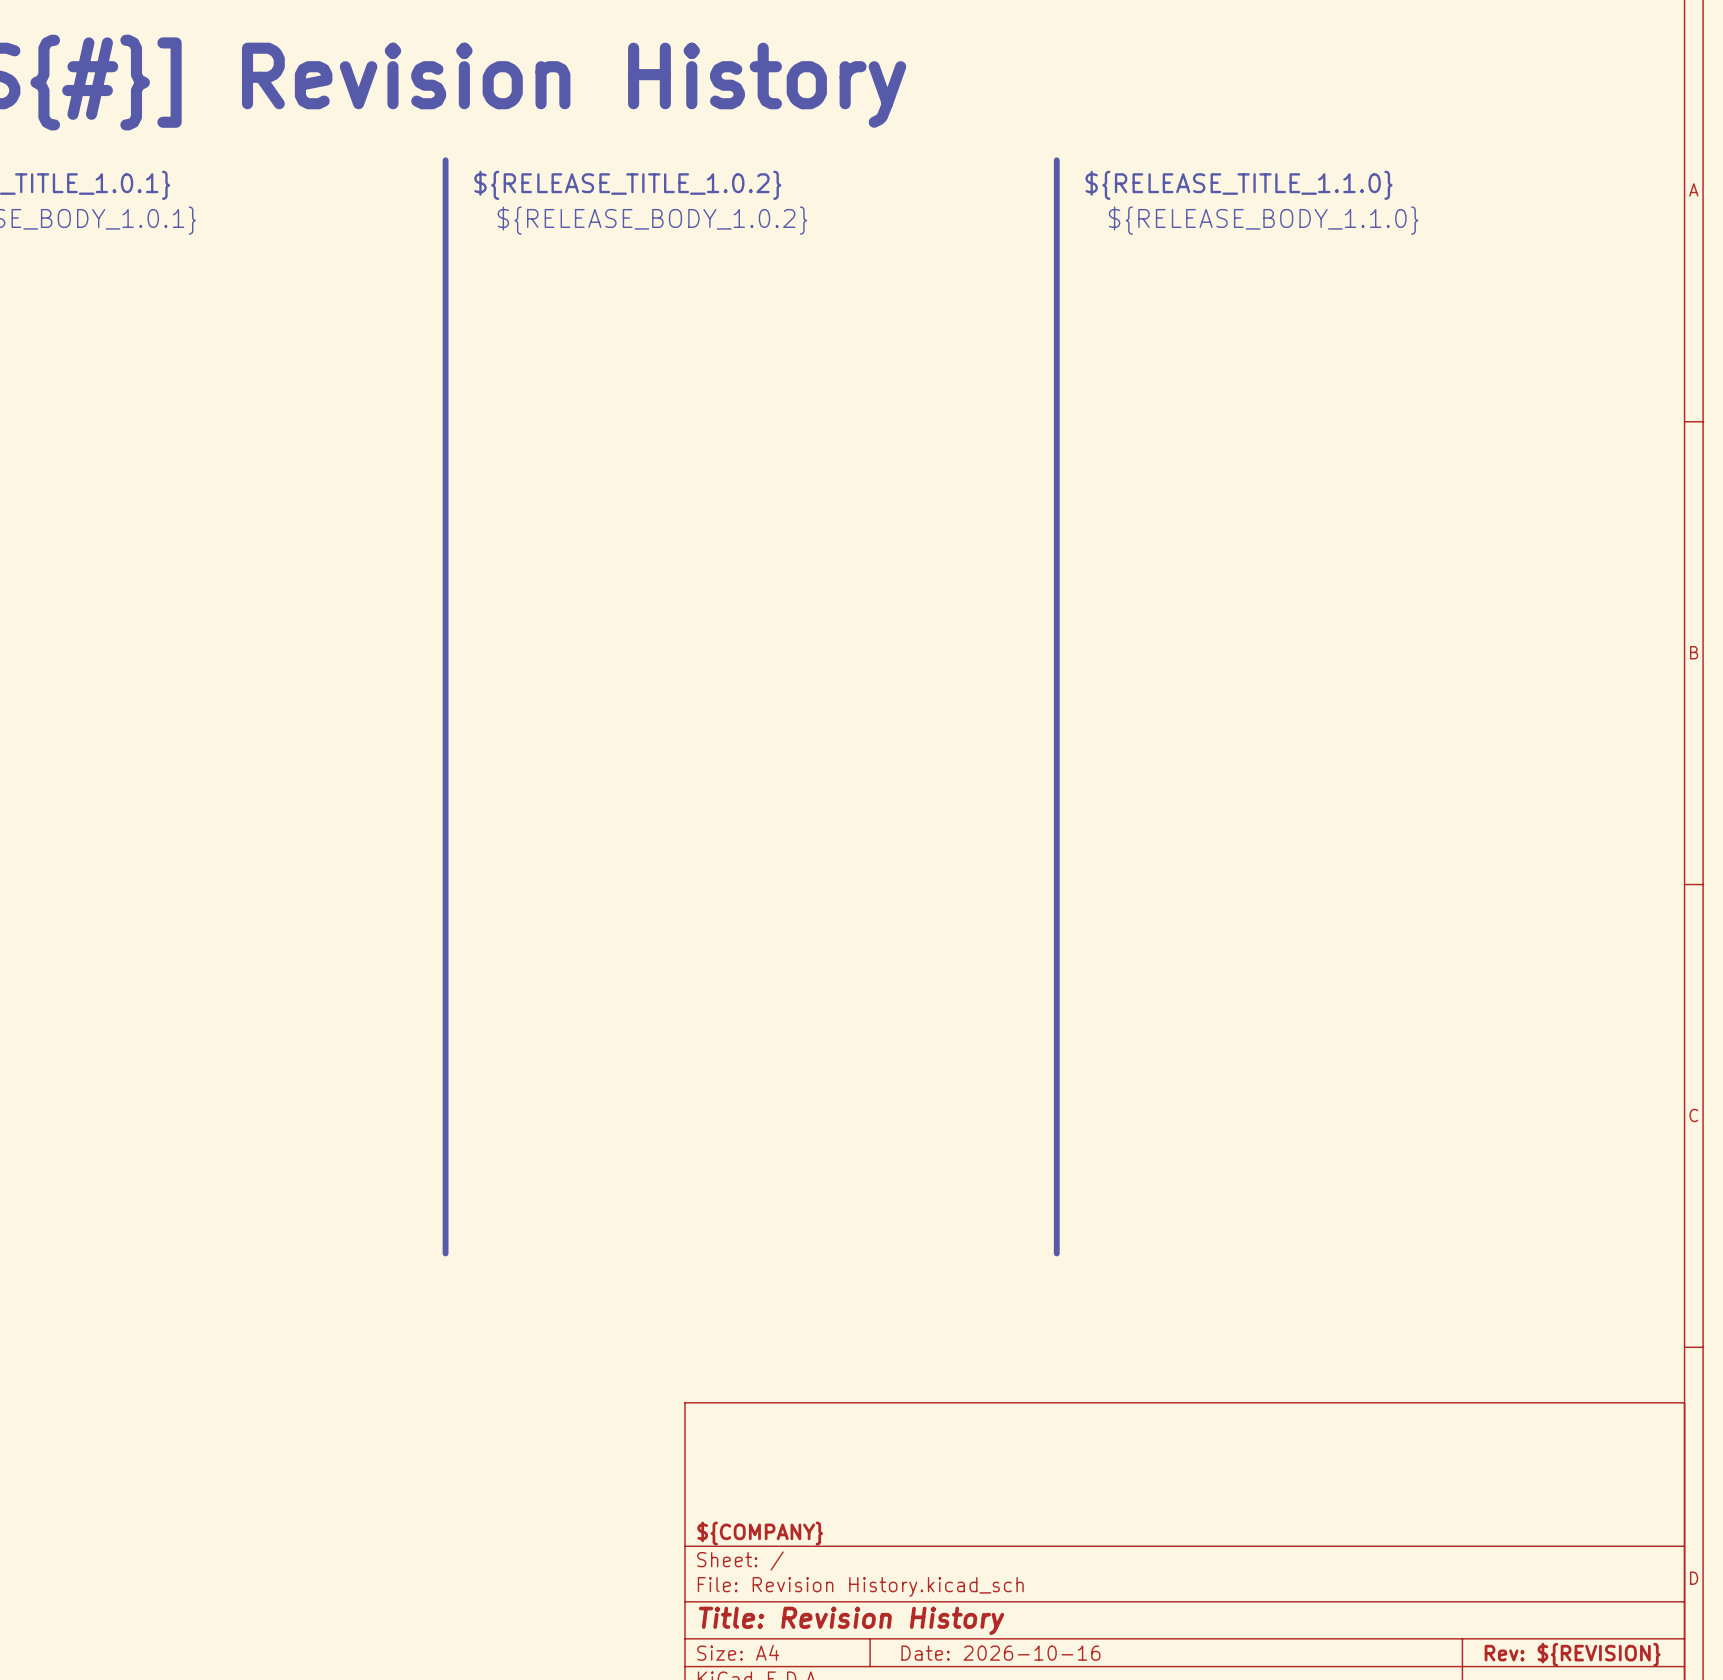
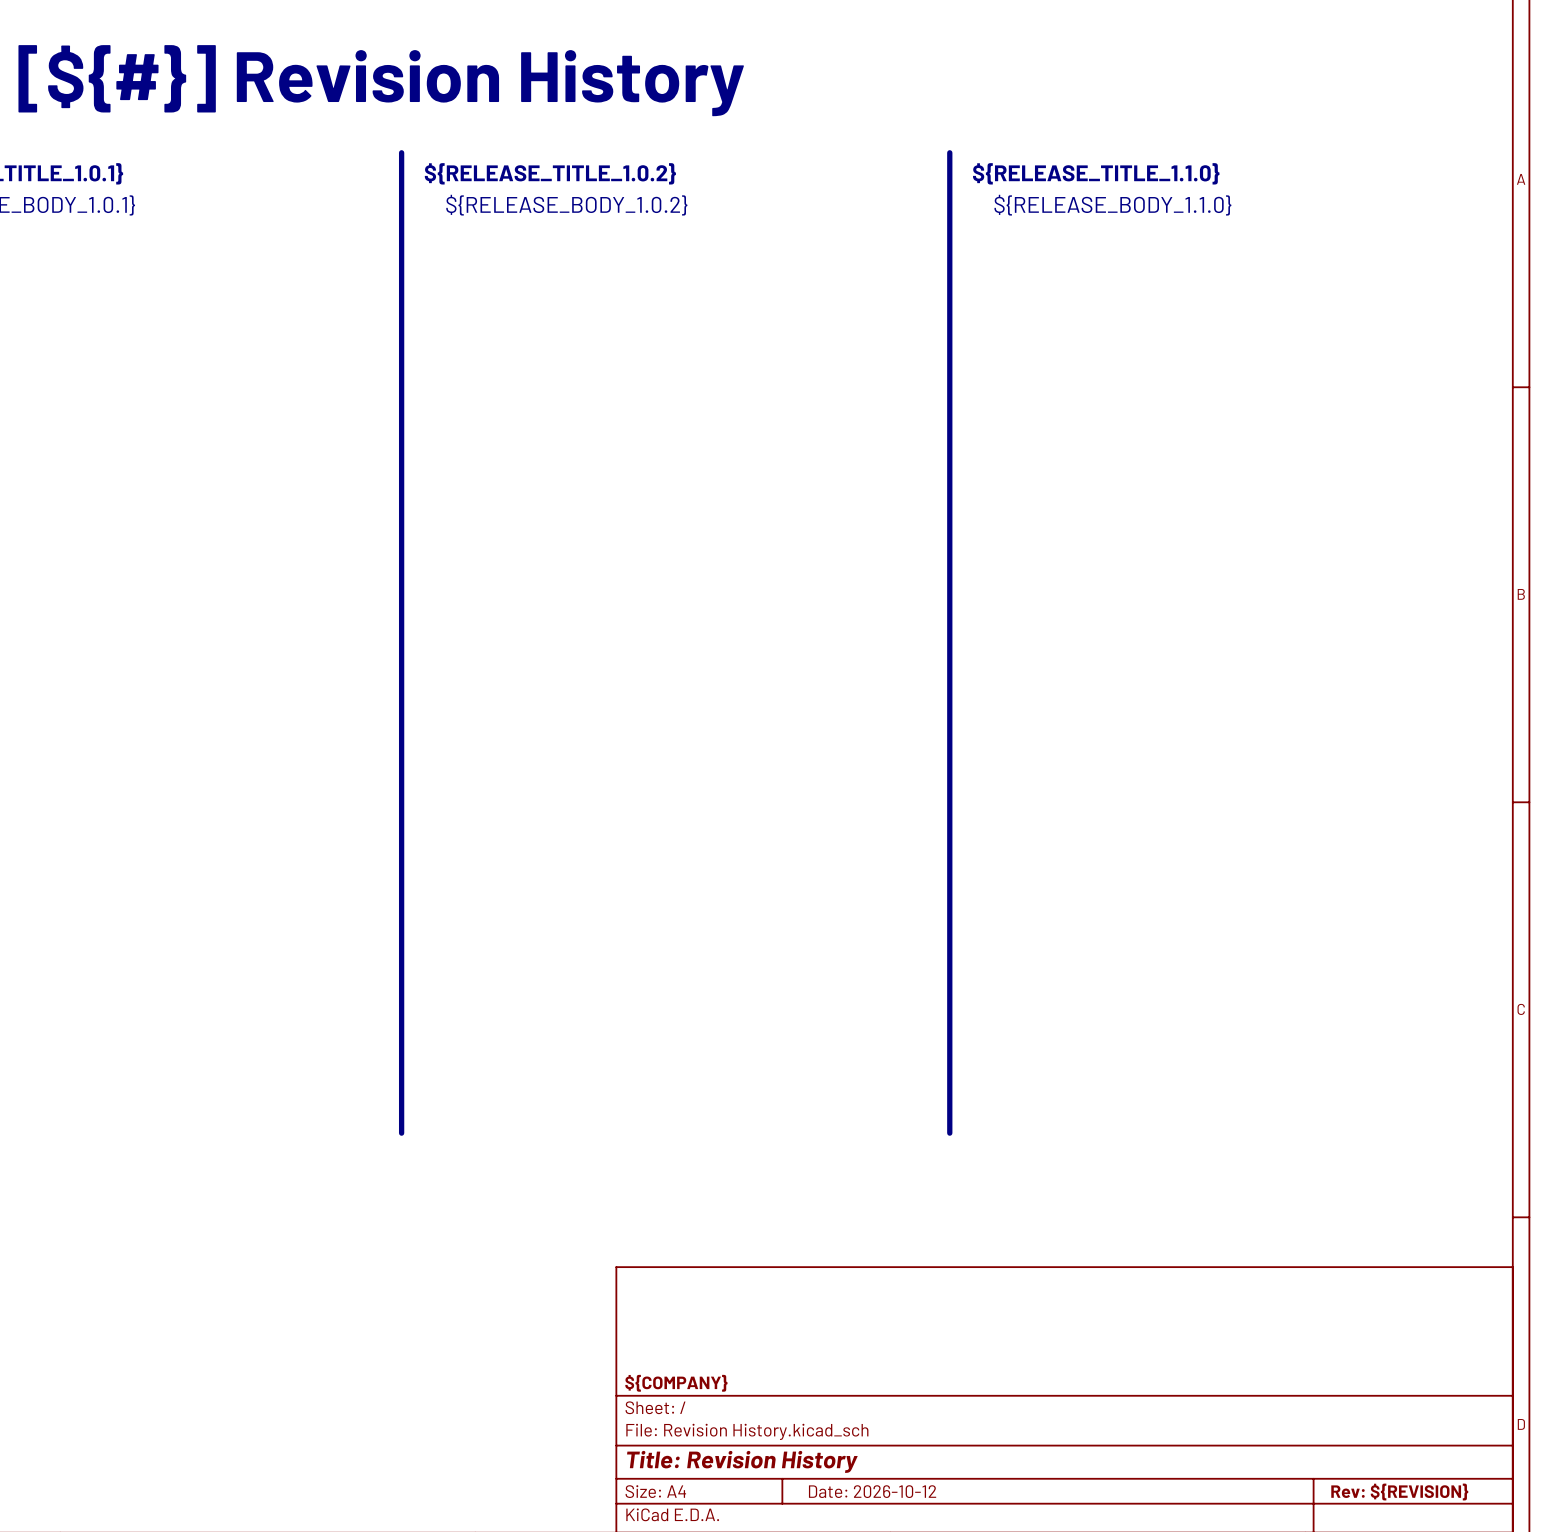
title block: Date: 2026-10-16 (1000, 1653) -> Date: 2026-10-12 (872, 1491)

